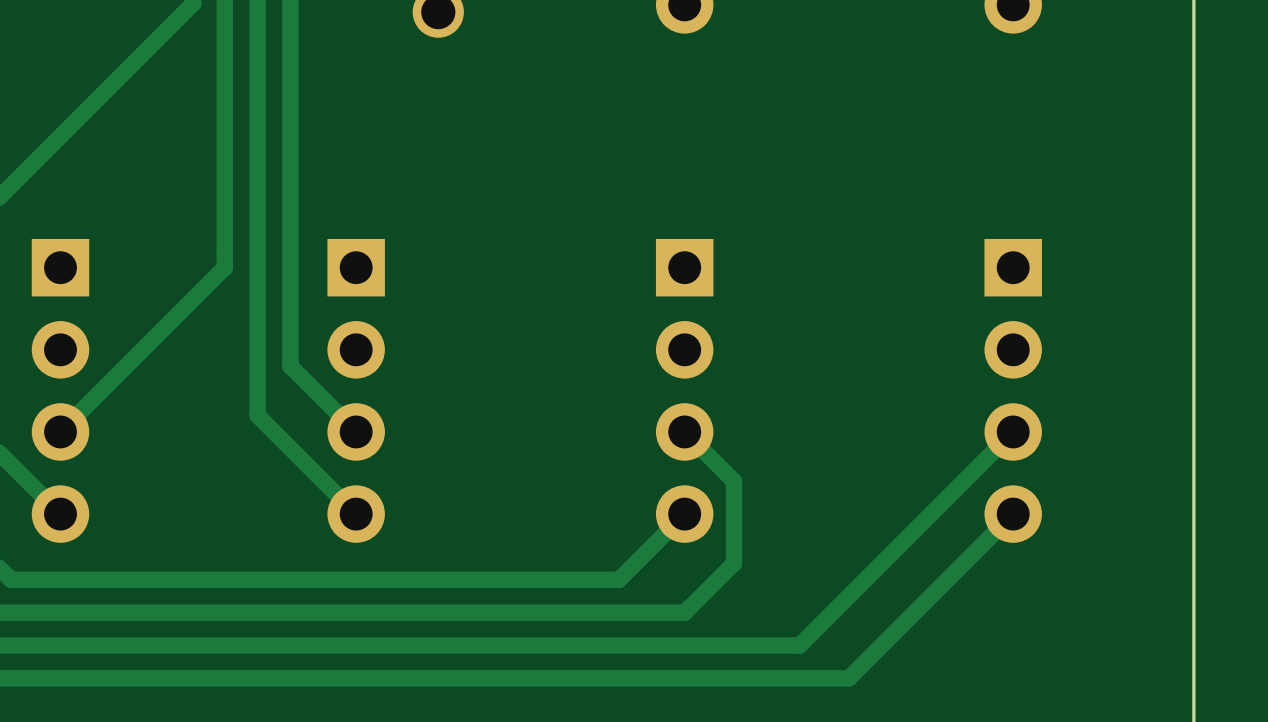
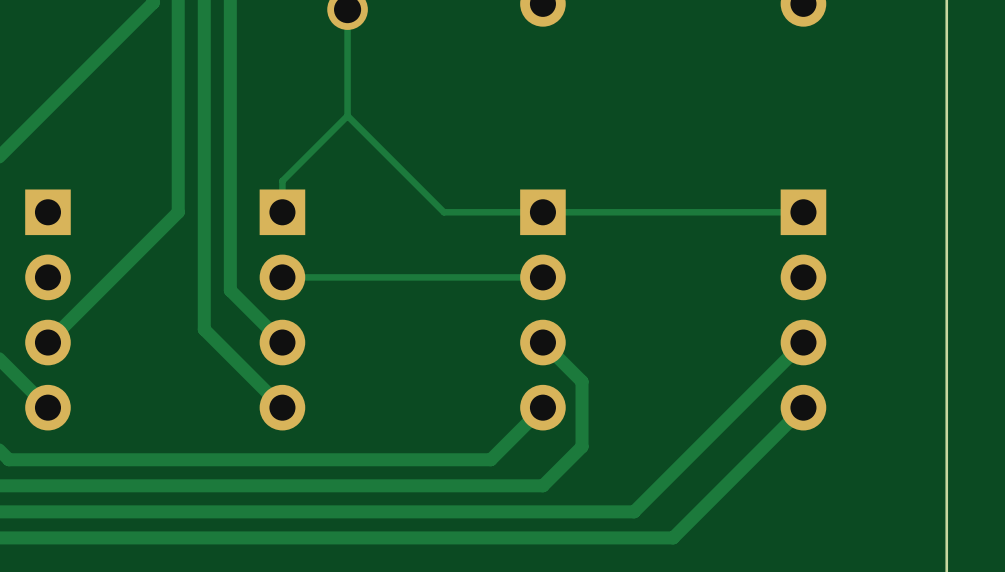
track: none -> (347, 9) (347, 115)
track: none -> (347, 115) (443, 212) (803, 212)
track: none -> (347, 115) (282, 181) (282, 212)
track: none -> (542, 277) (282, 277)

